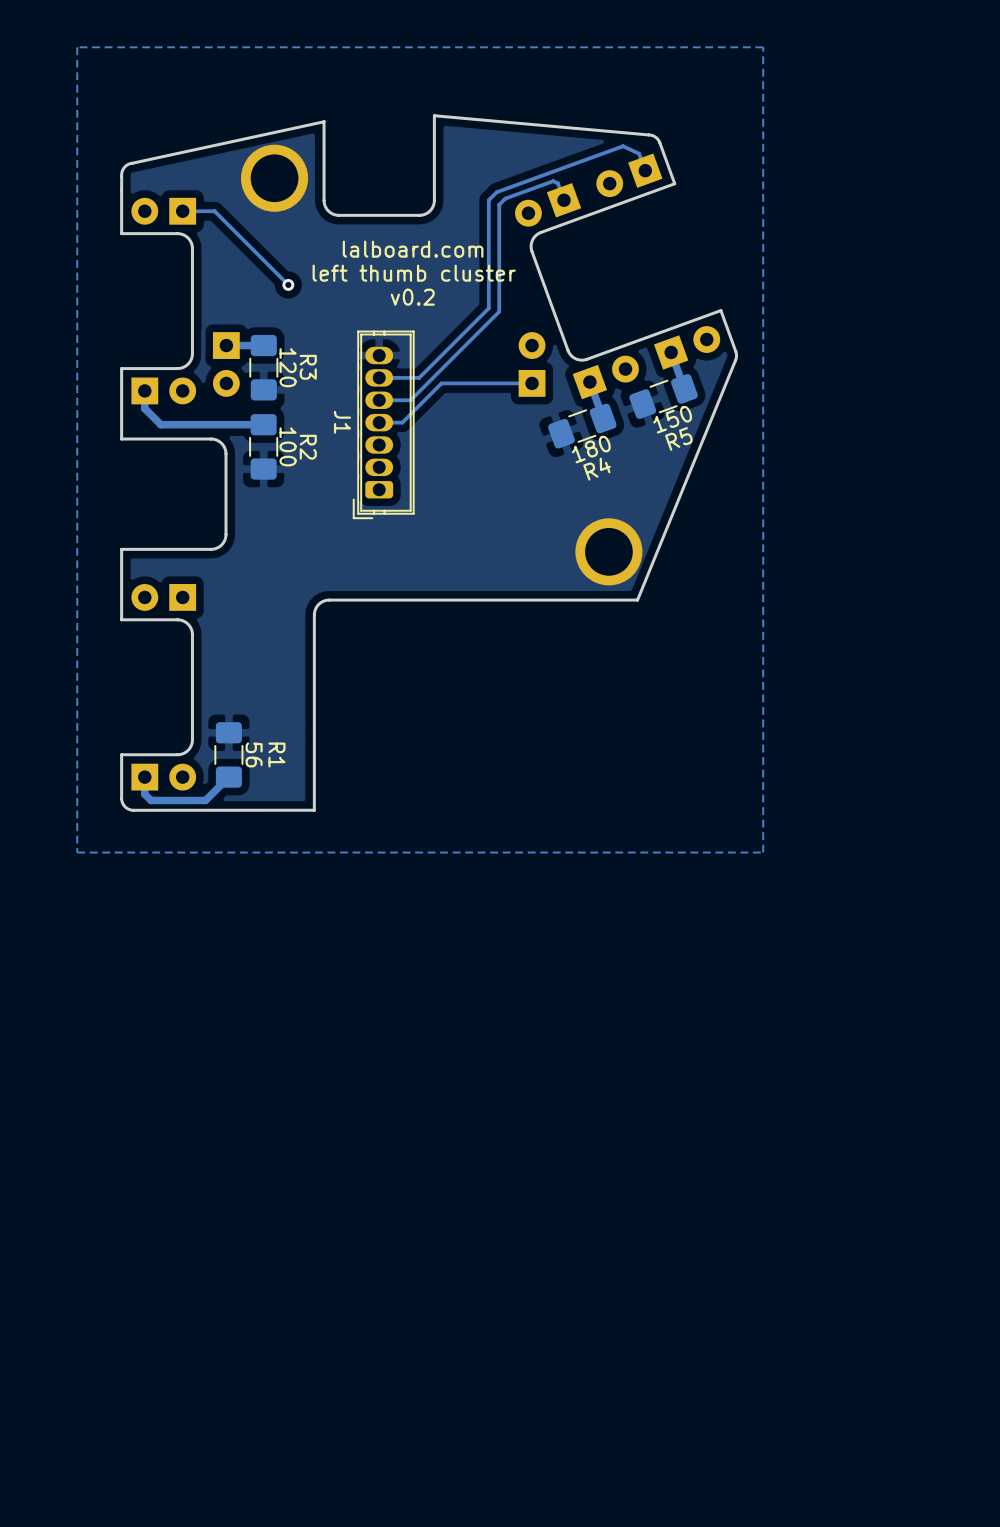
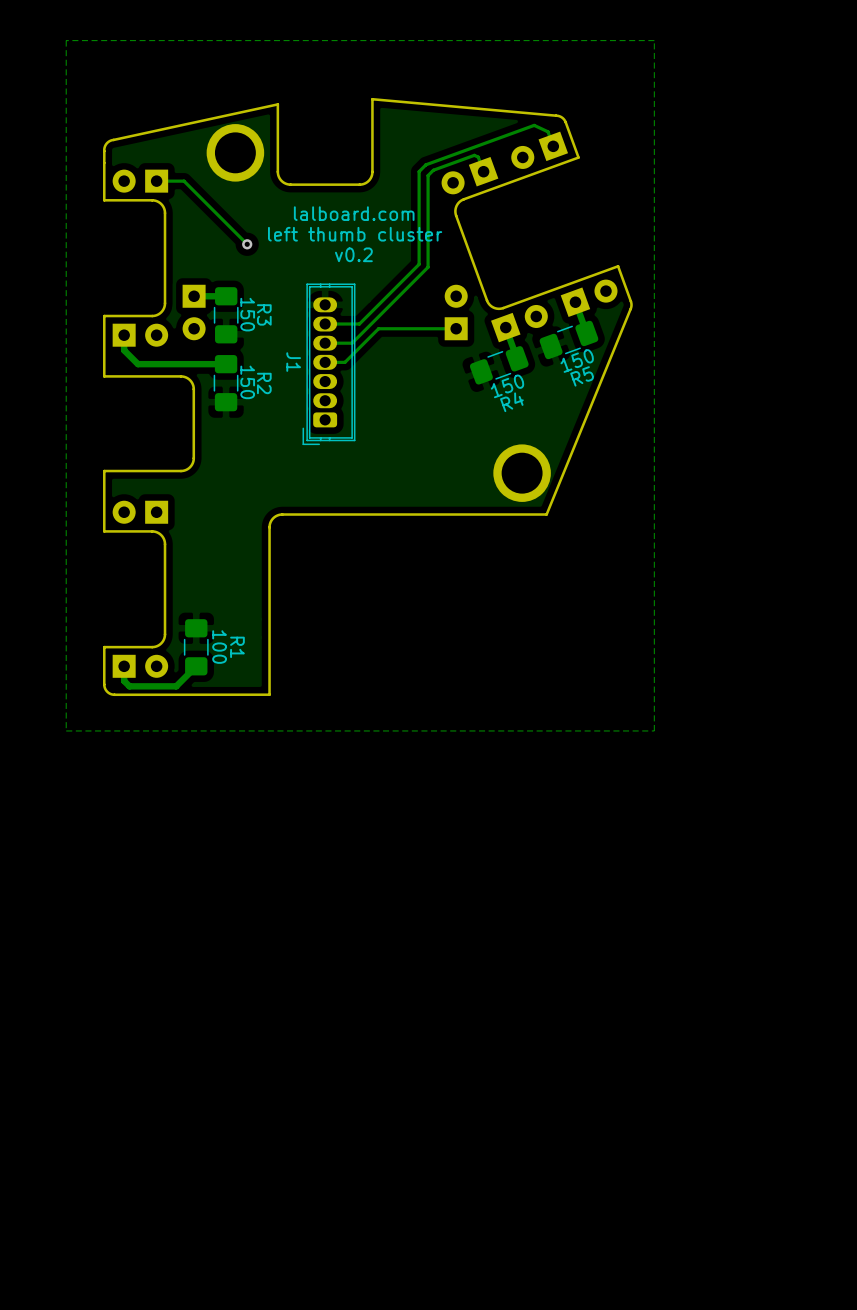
text: none -> 150 (247, 314)
R3 value: 120 (288, 367) -> none
R5 value: 150 (672, 419) -> none
text: none -> 150 (577, 361)
text: none -> 150 (247, 382)
R2 value: 100 (288, 446) -> none
R4 value: 180 (591, 449) -> none
text: none -> 150 (507, 386)
R1 value: 56 (254, 754) -> none
text: none -> 100 (219, 647)

